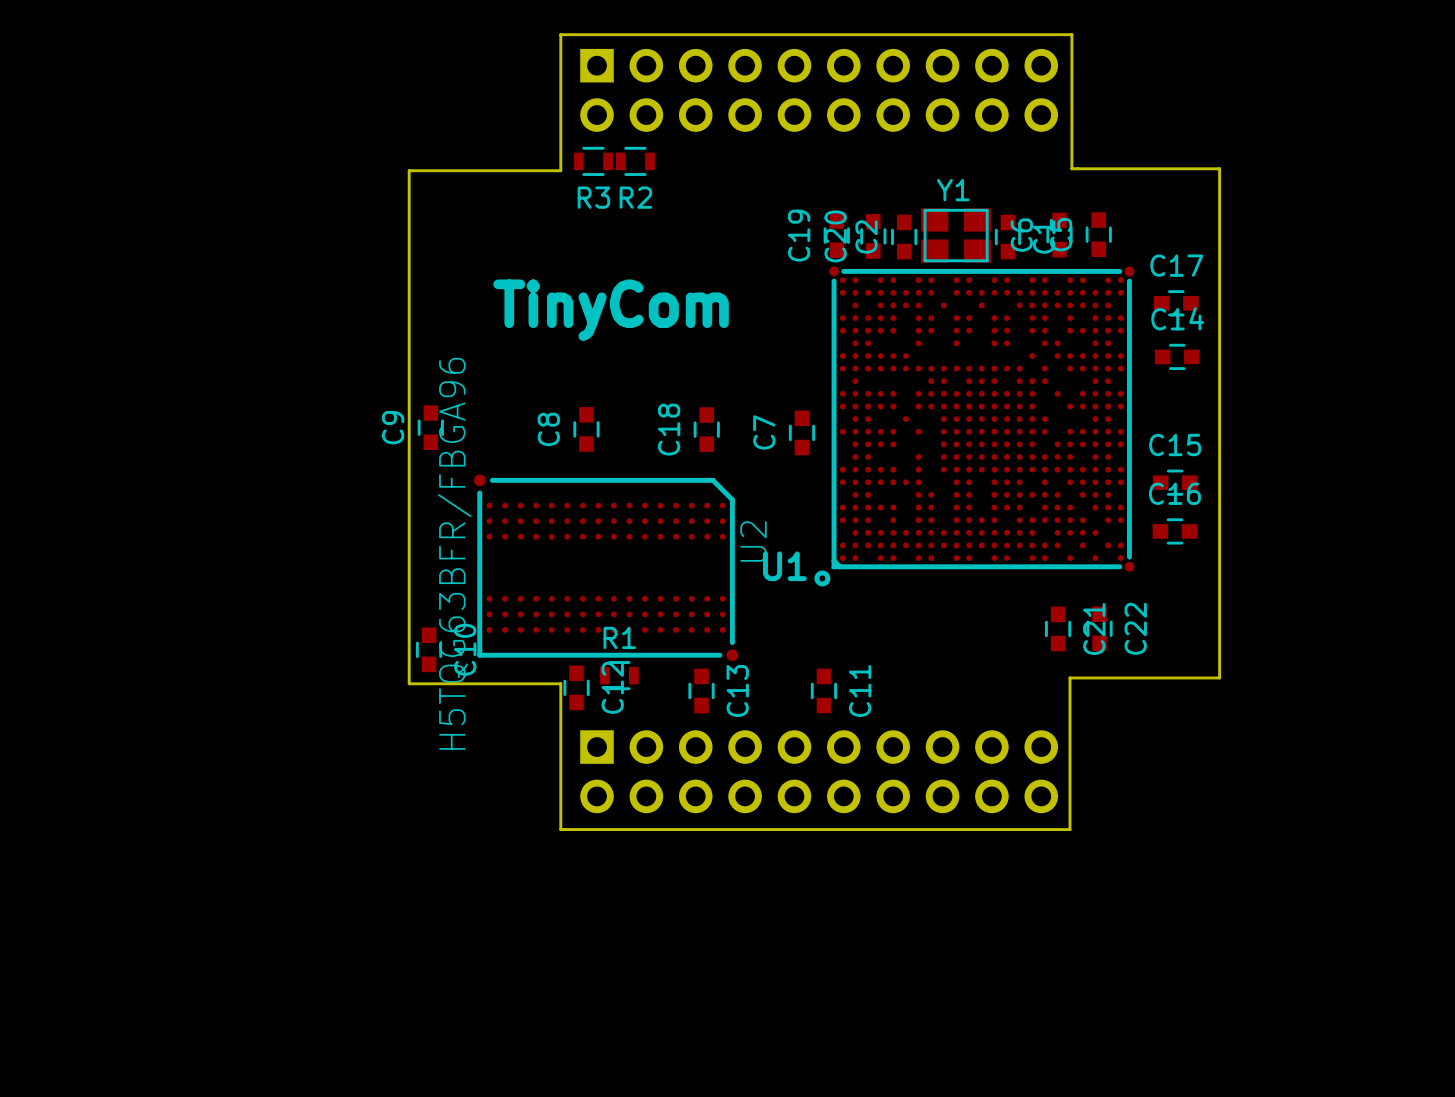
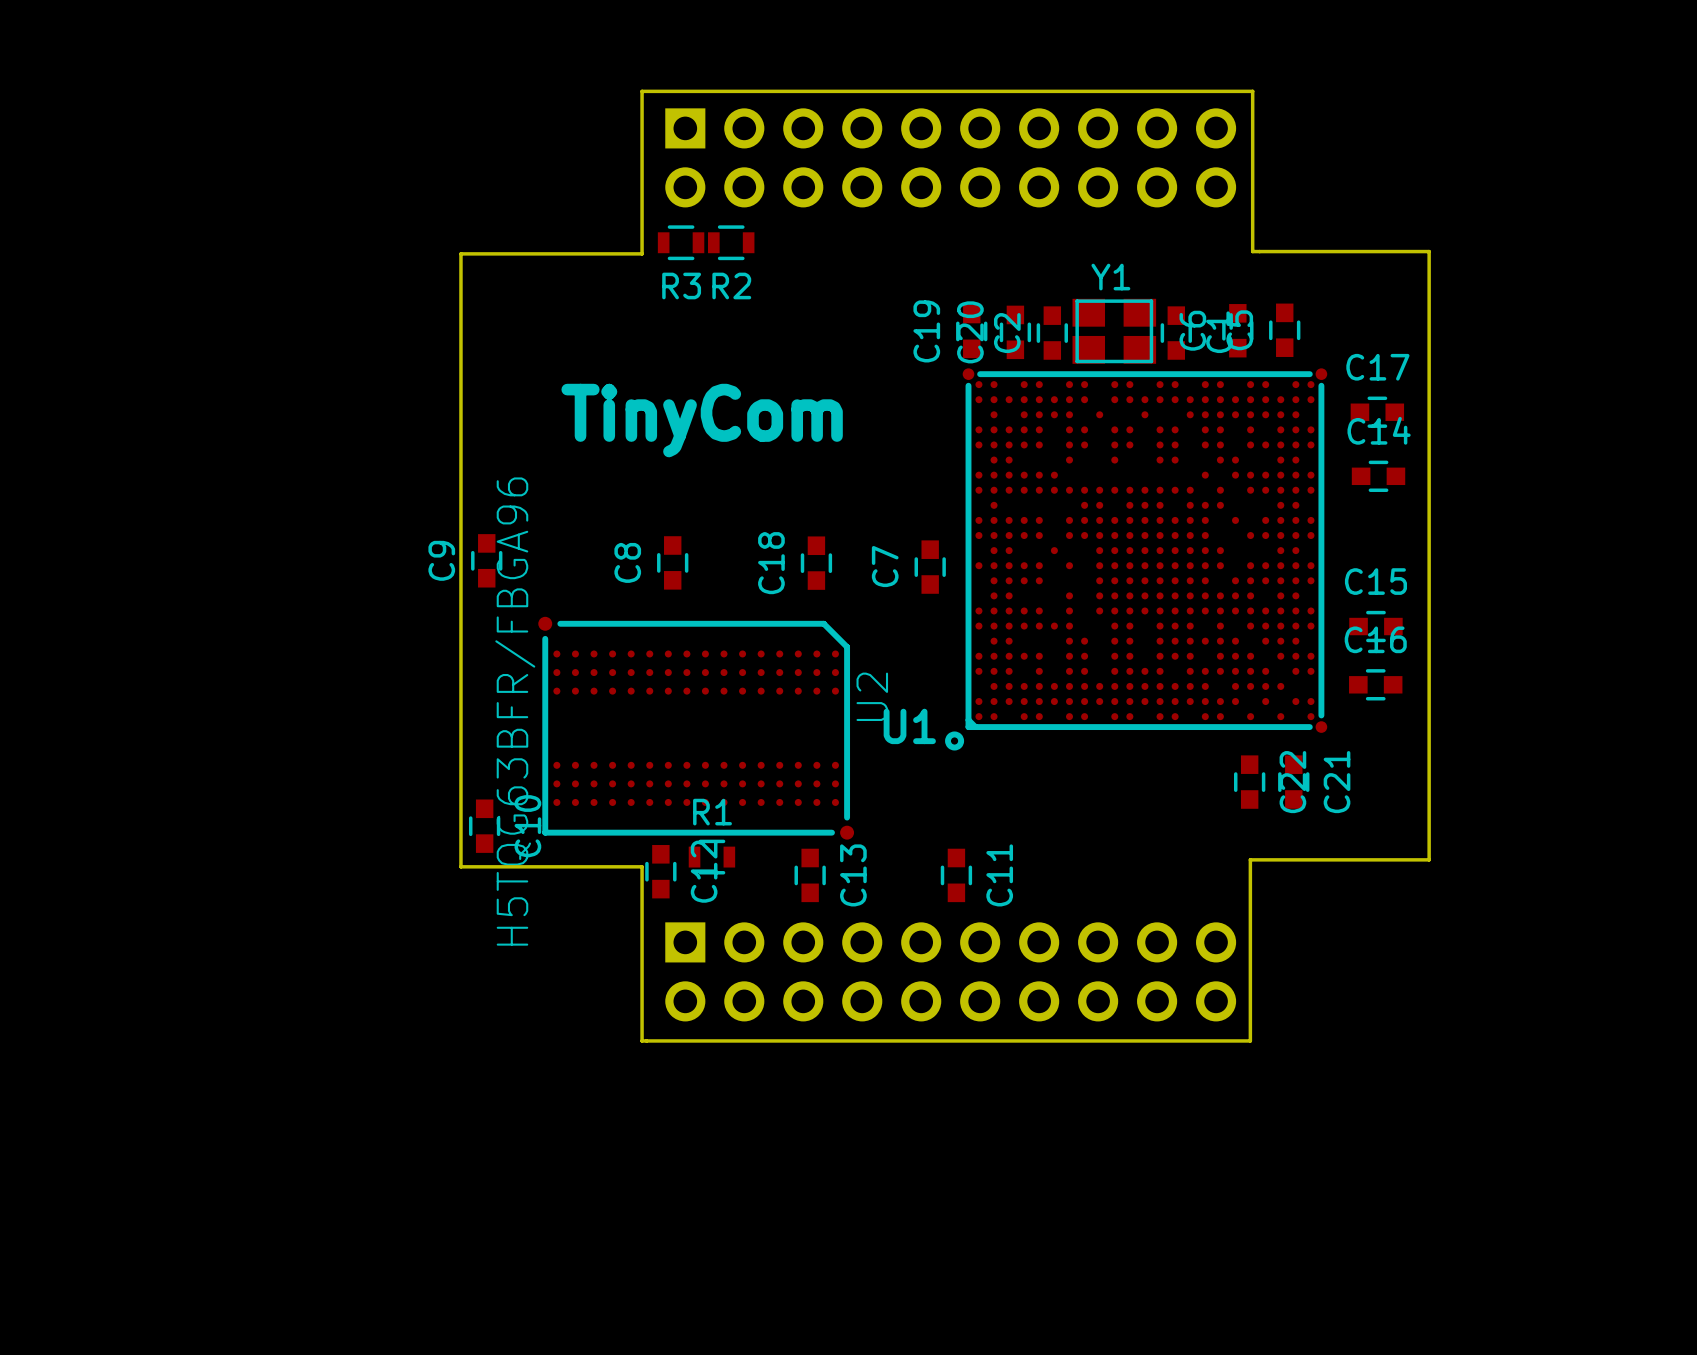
C21 position: (1058, 628) -> (1293, 782)
C22 position: (1099, 628) -> (1249, 782)

